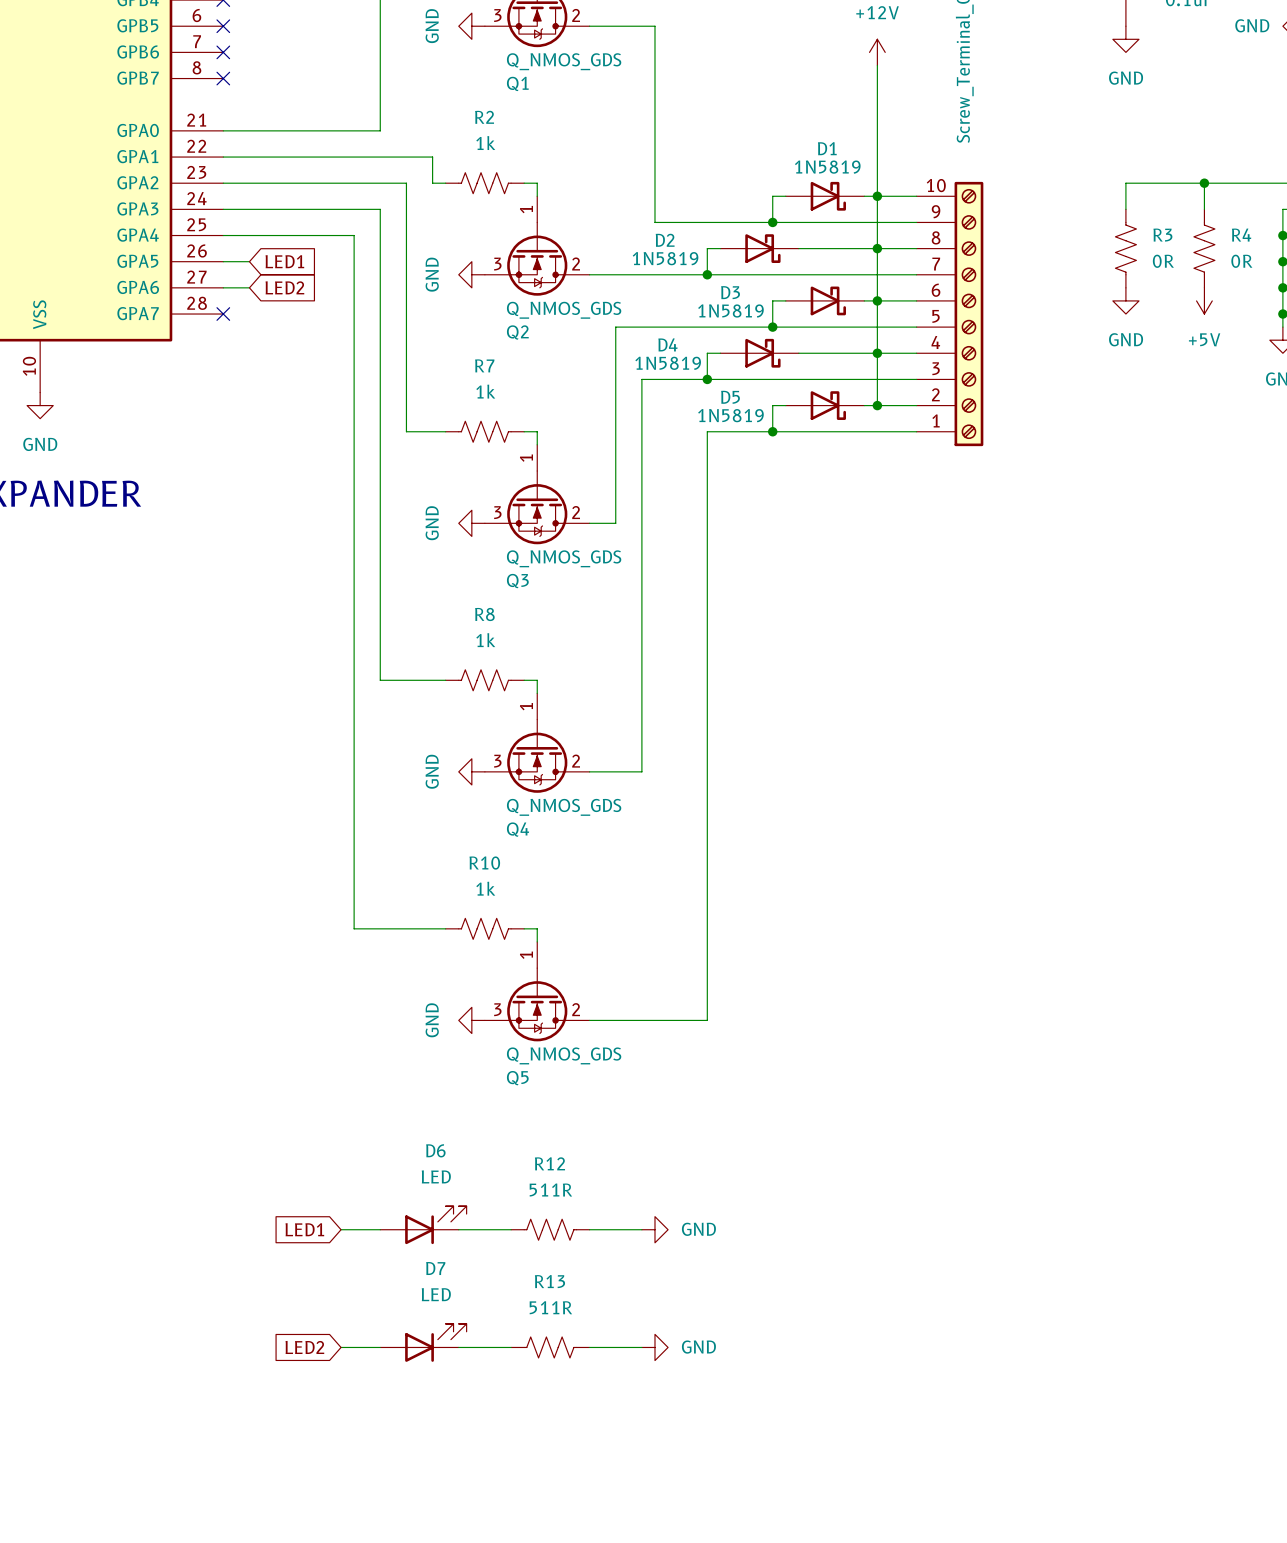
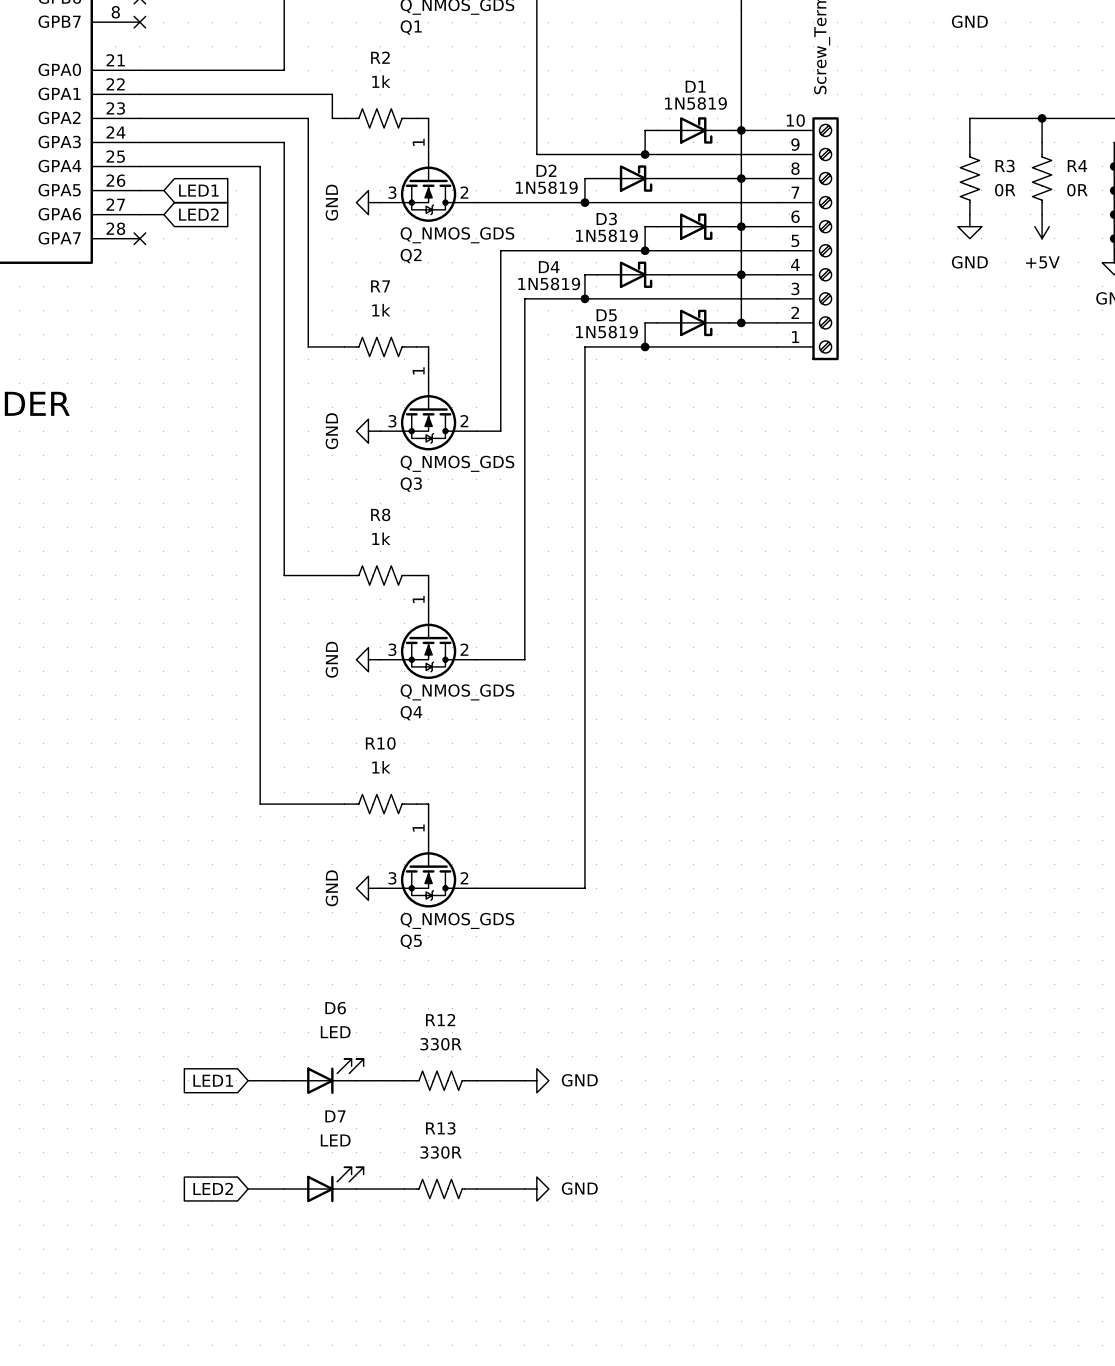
R12 value: 511R (550, 1189) -> 330R (441, 1044)
R13 value: 511R (550, 1307) -> 330R (441, 1152)

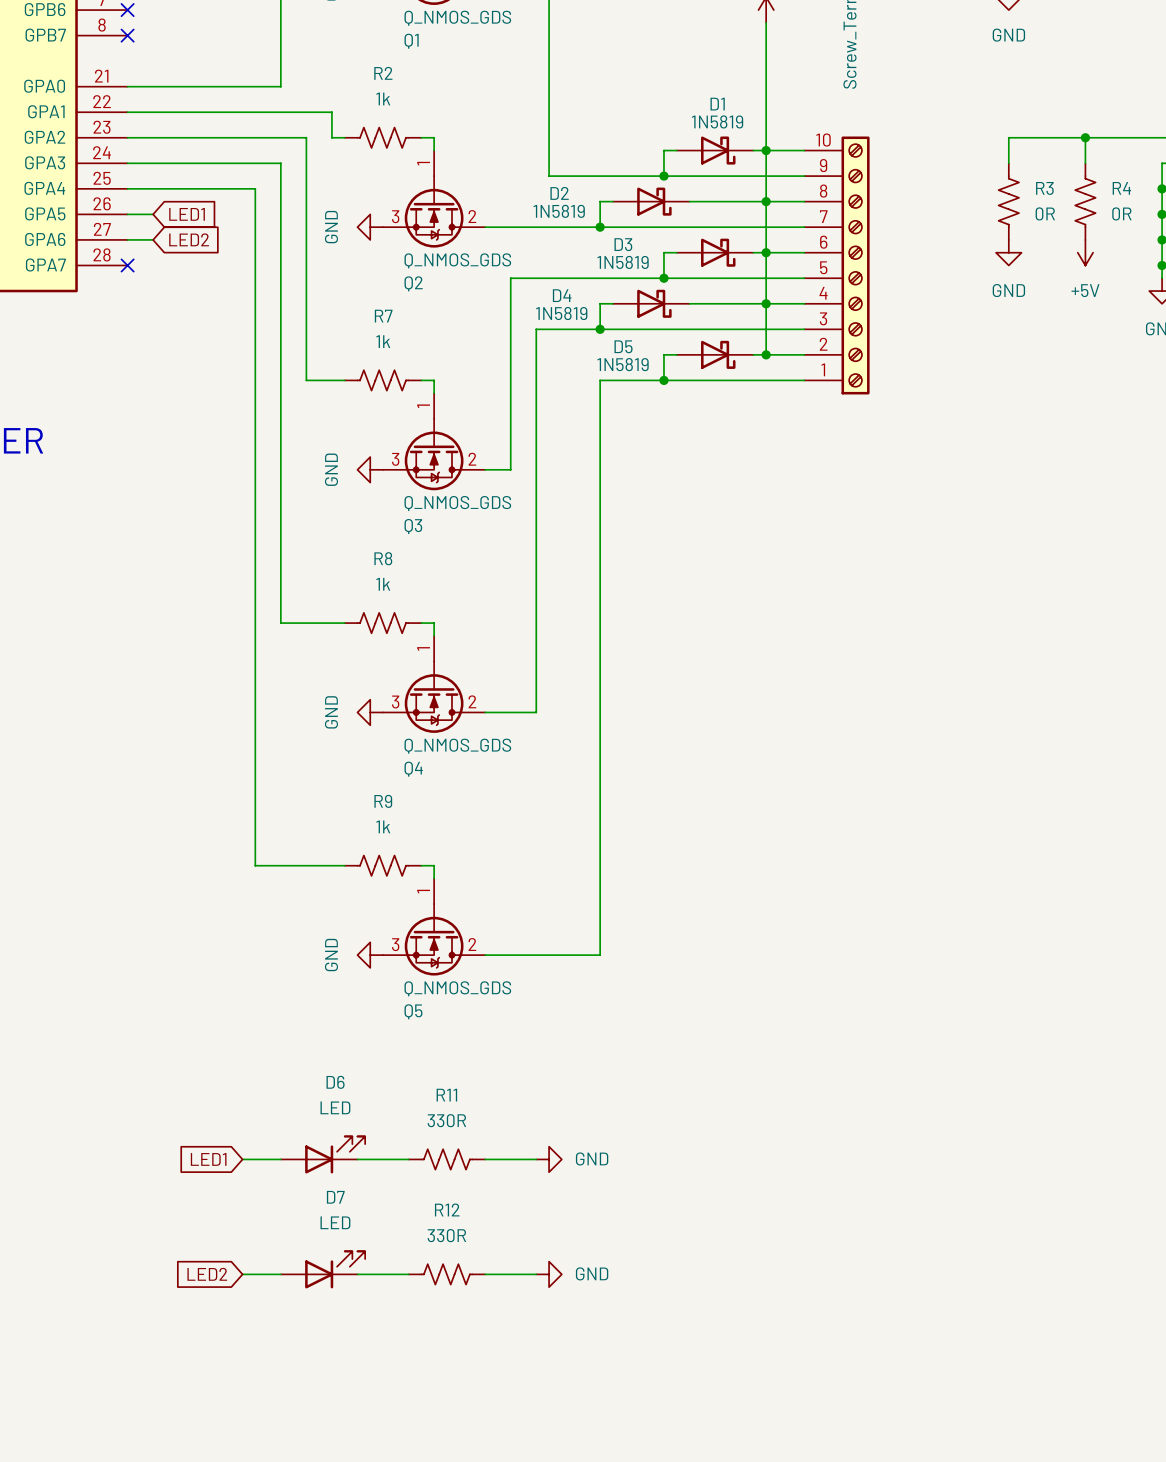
R10 name: R10 (380, 743) -> R9 (383, 801)
R12 name: R12 (440, 1020) -> R11 (446, 1095)
R13 name: R13 (440, 1128) -> R12 (447, 1209)

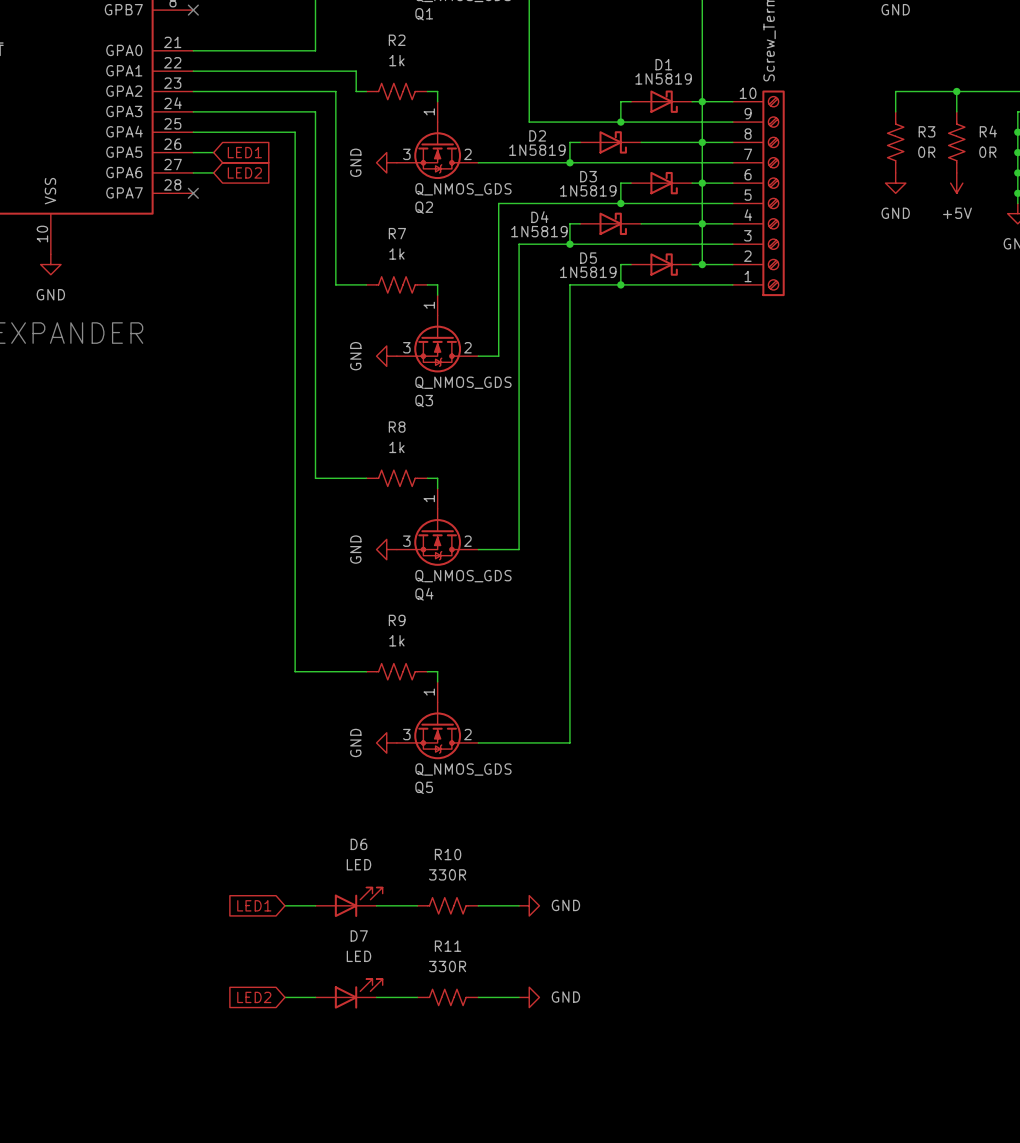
R11 name: R11 (446, 1095) -> R10 (448, 854)
R12 name: R12 (447, 1209) -> R11 (448, 946)

